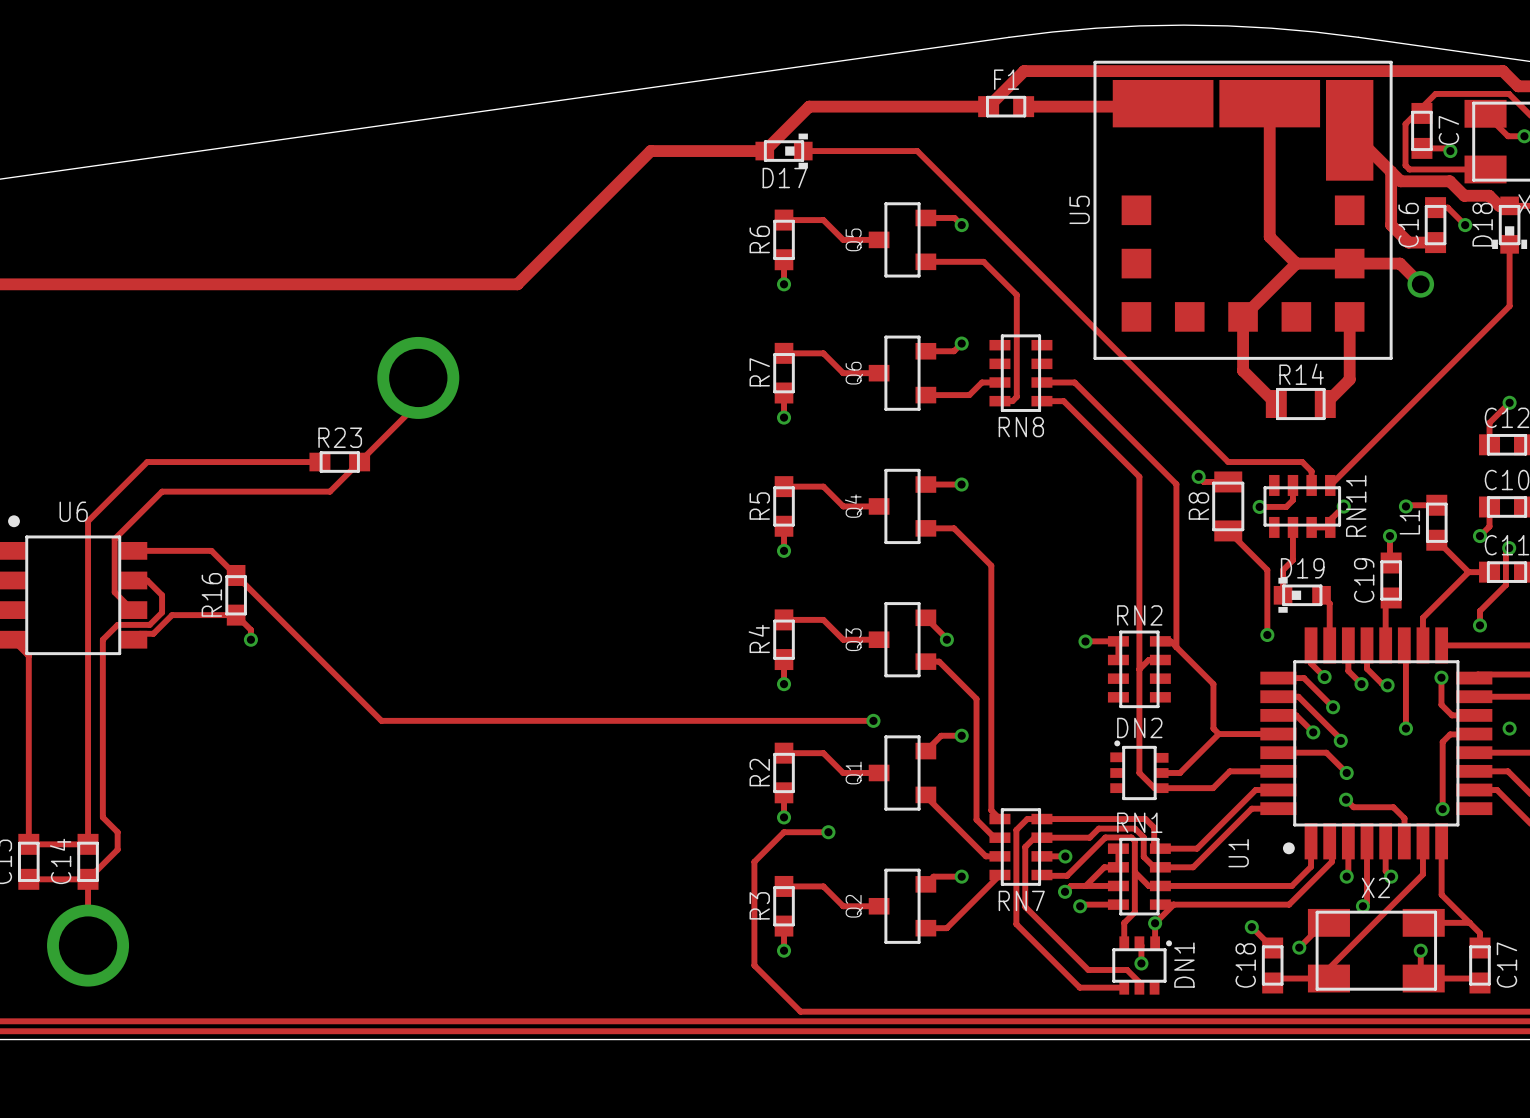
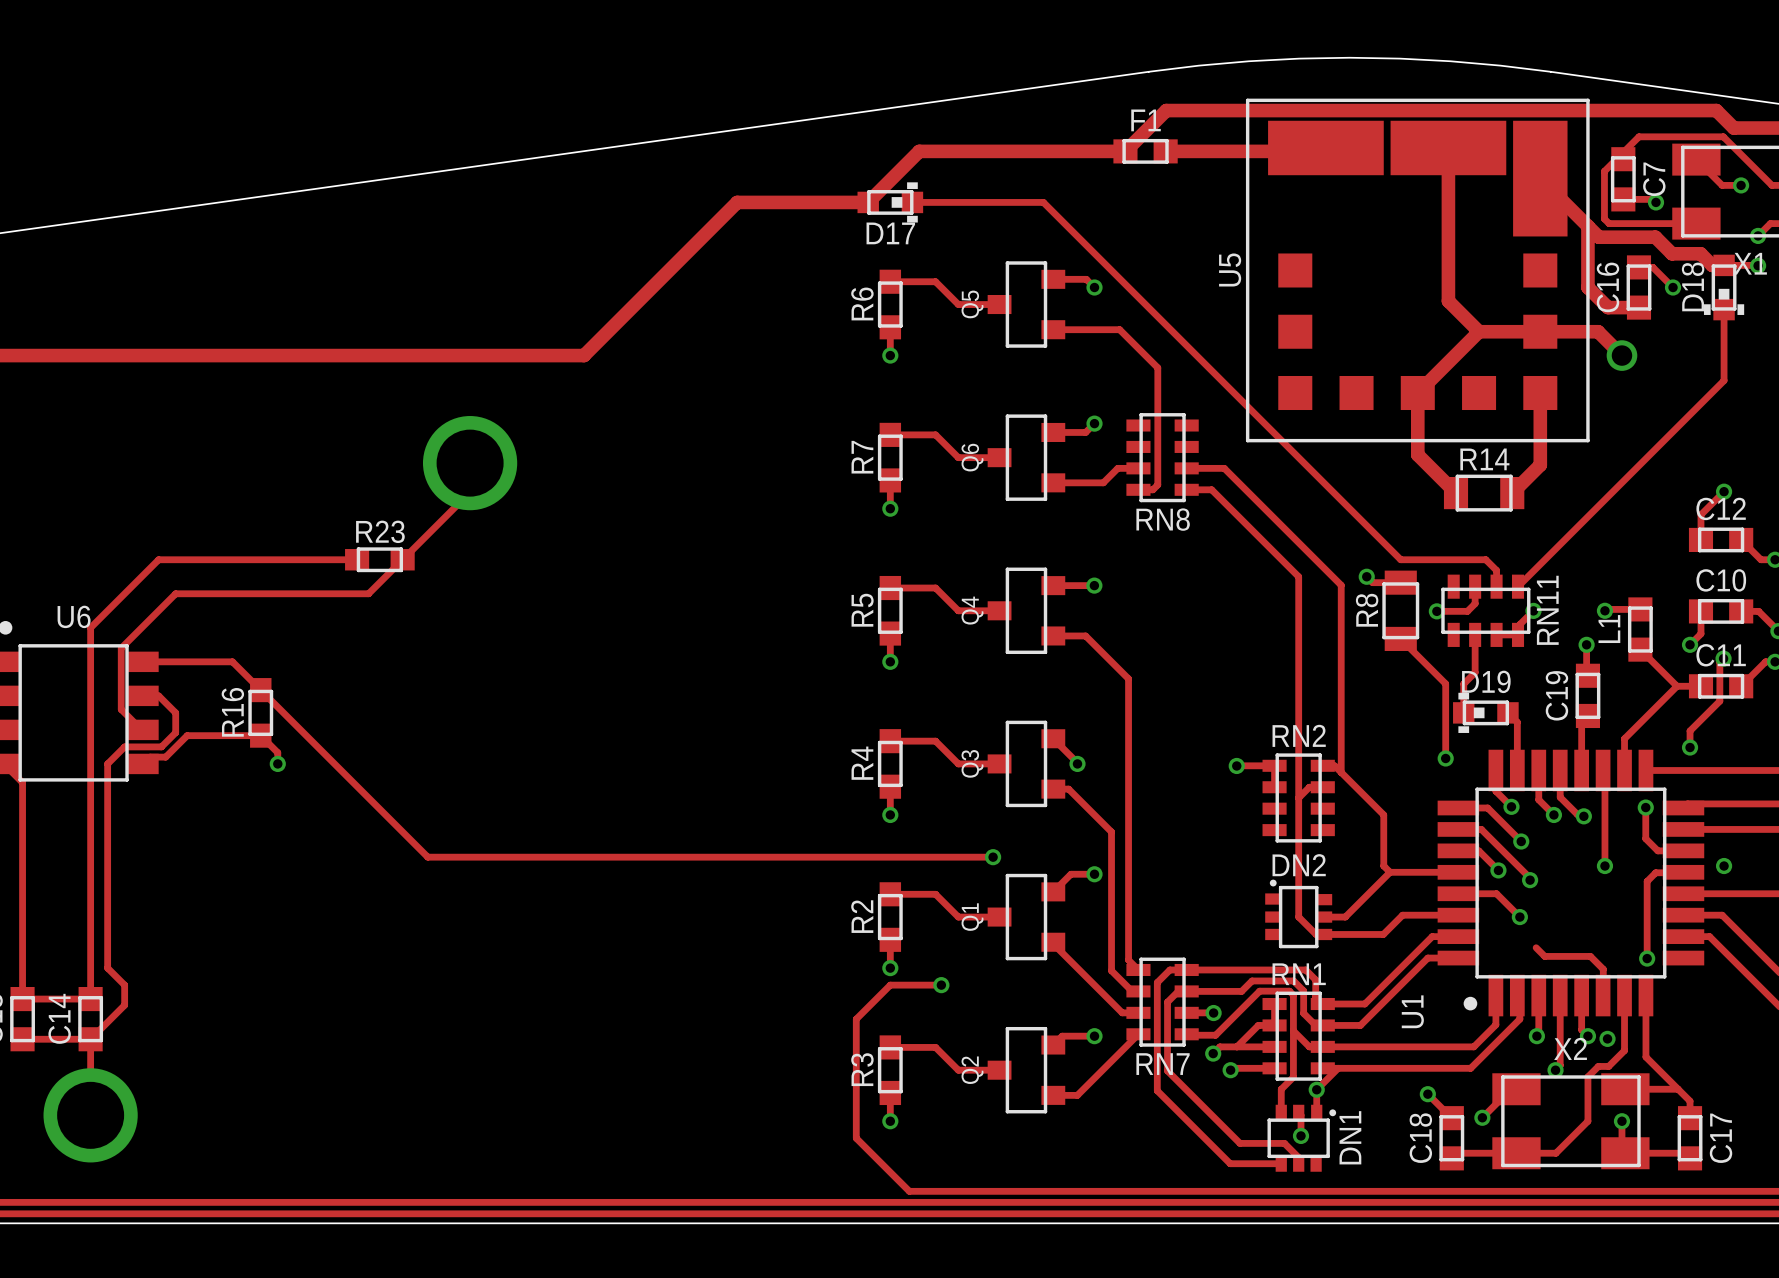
track: (1311, 752) (1326, 752) (1346, 772) -> (1496, 893) (1519, 917)
via position: (1346, 772) -> (1519, 917)
via: (1346, 799) -> none
track: (1422, 874) (1328, 968) -> (1624, 1033) (1624, 1050) (1608, 1066) (1598, 1066) (1587, 1076) (1587, 1121) (1555, 1153) (1516, 1153)
via: none -> (1607, 1038)

